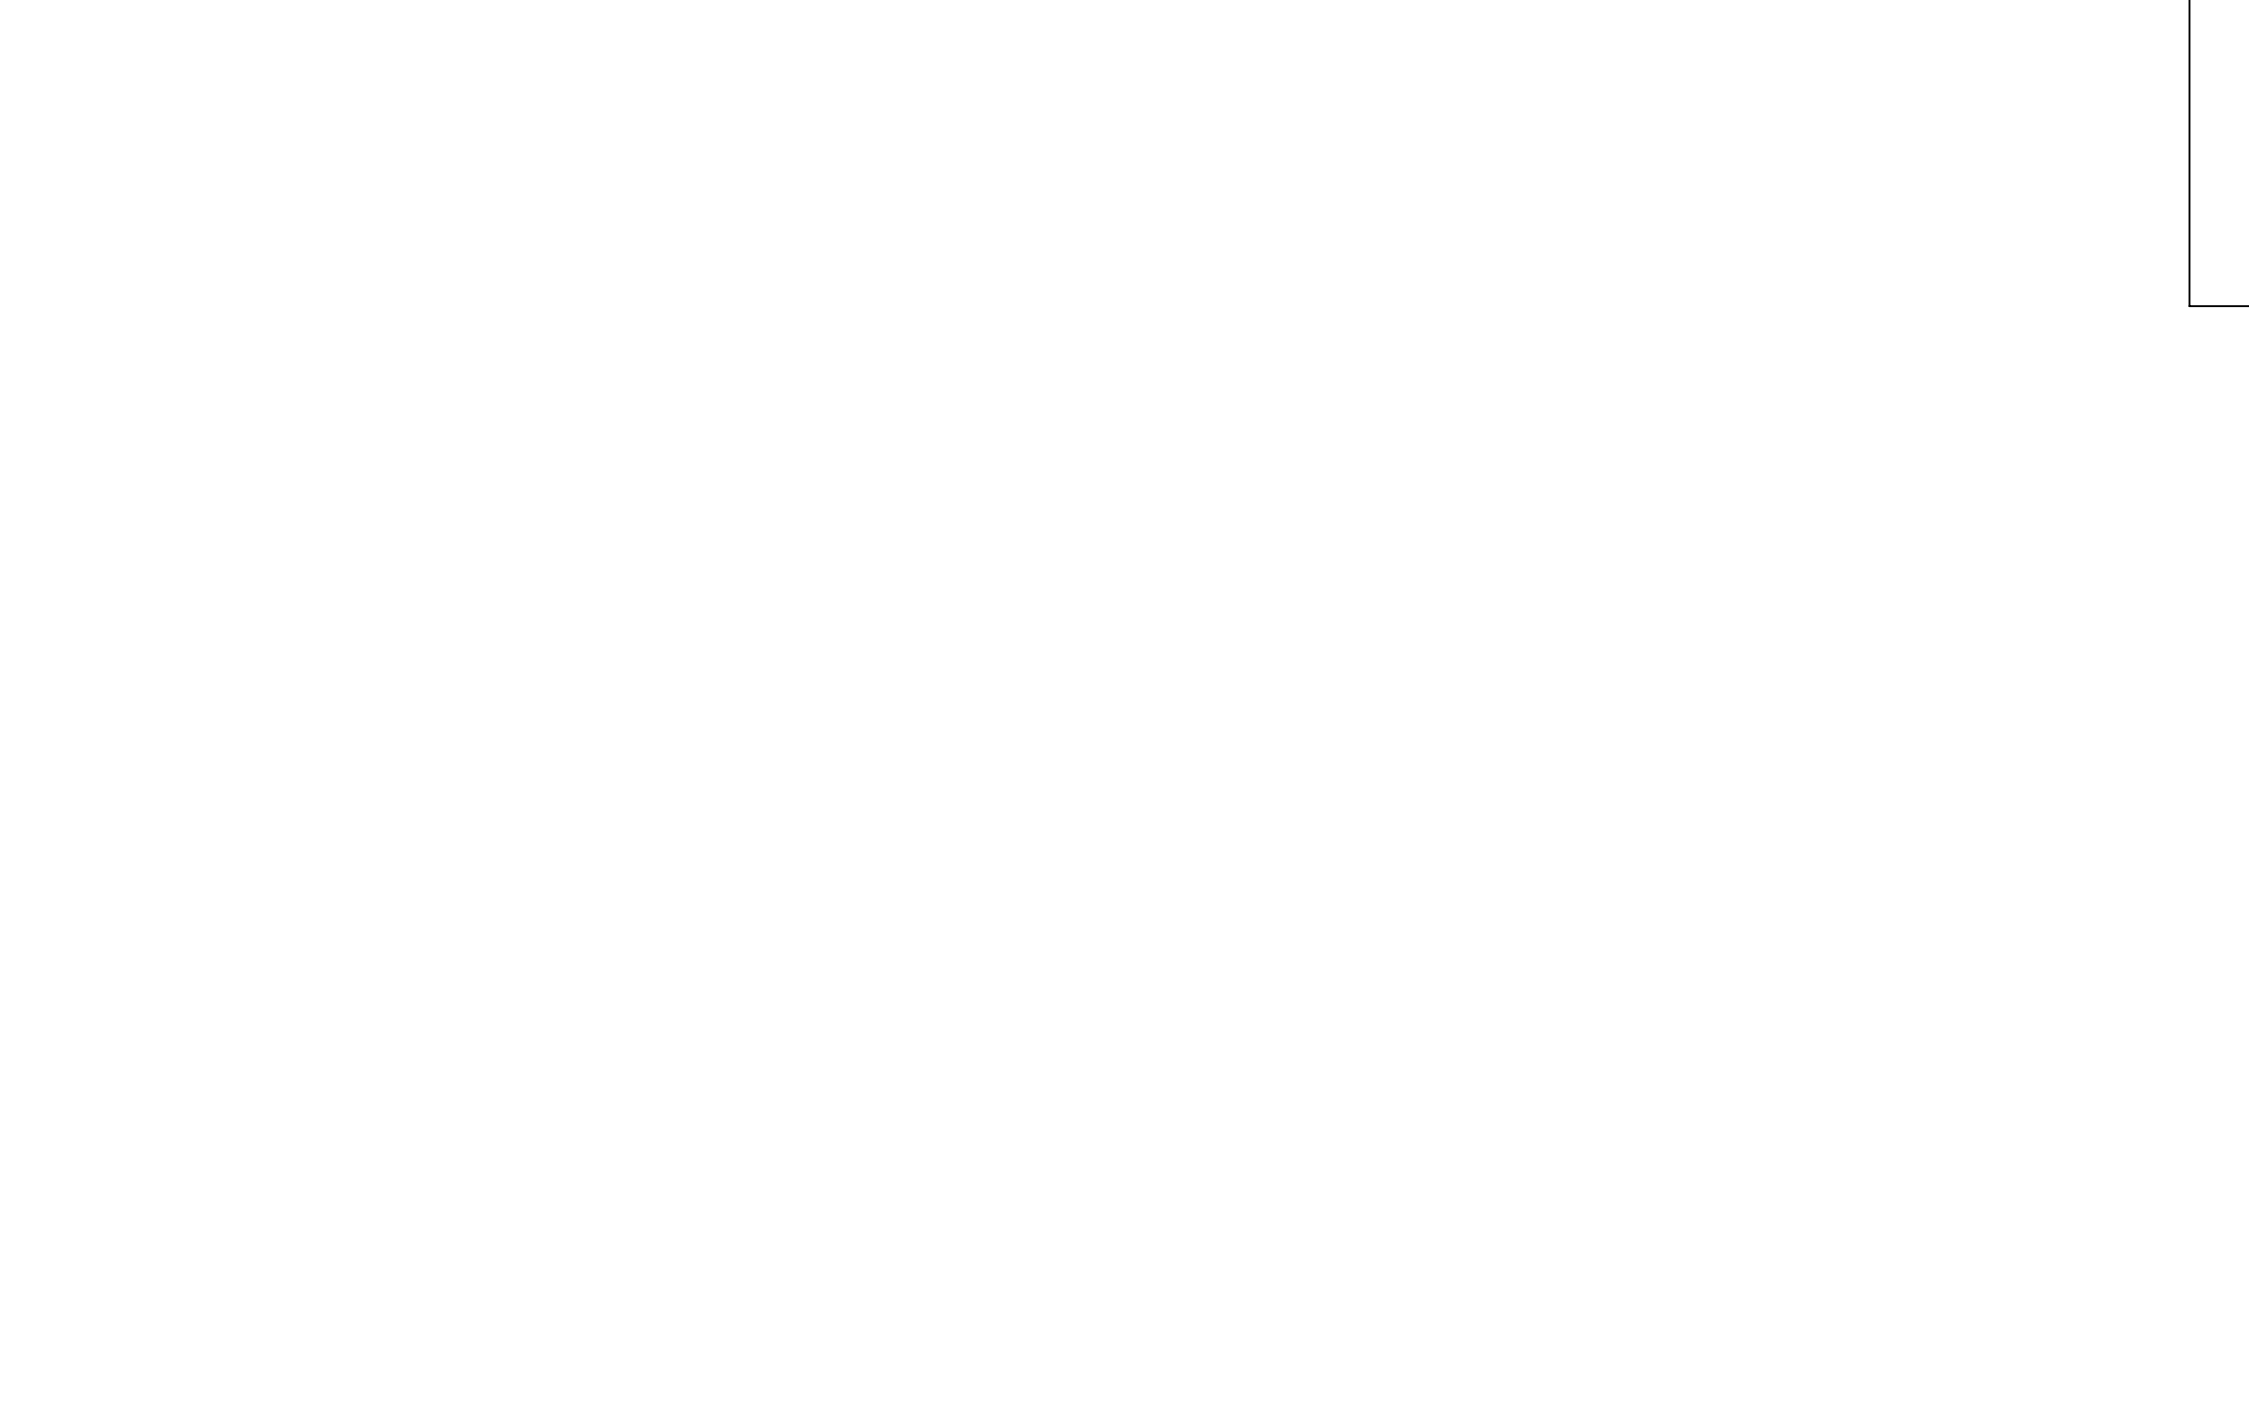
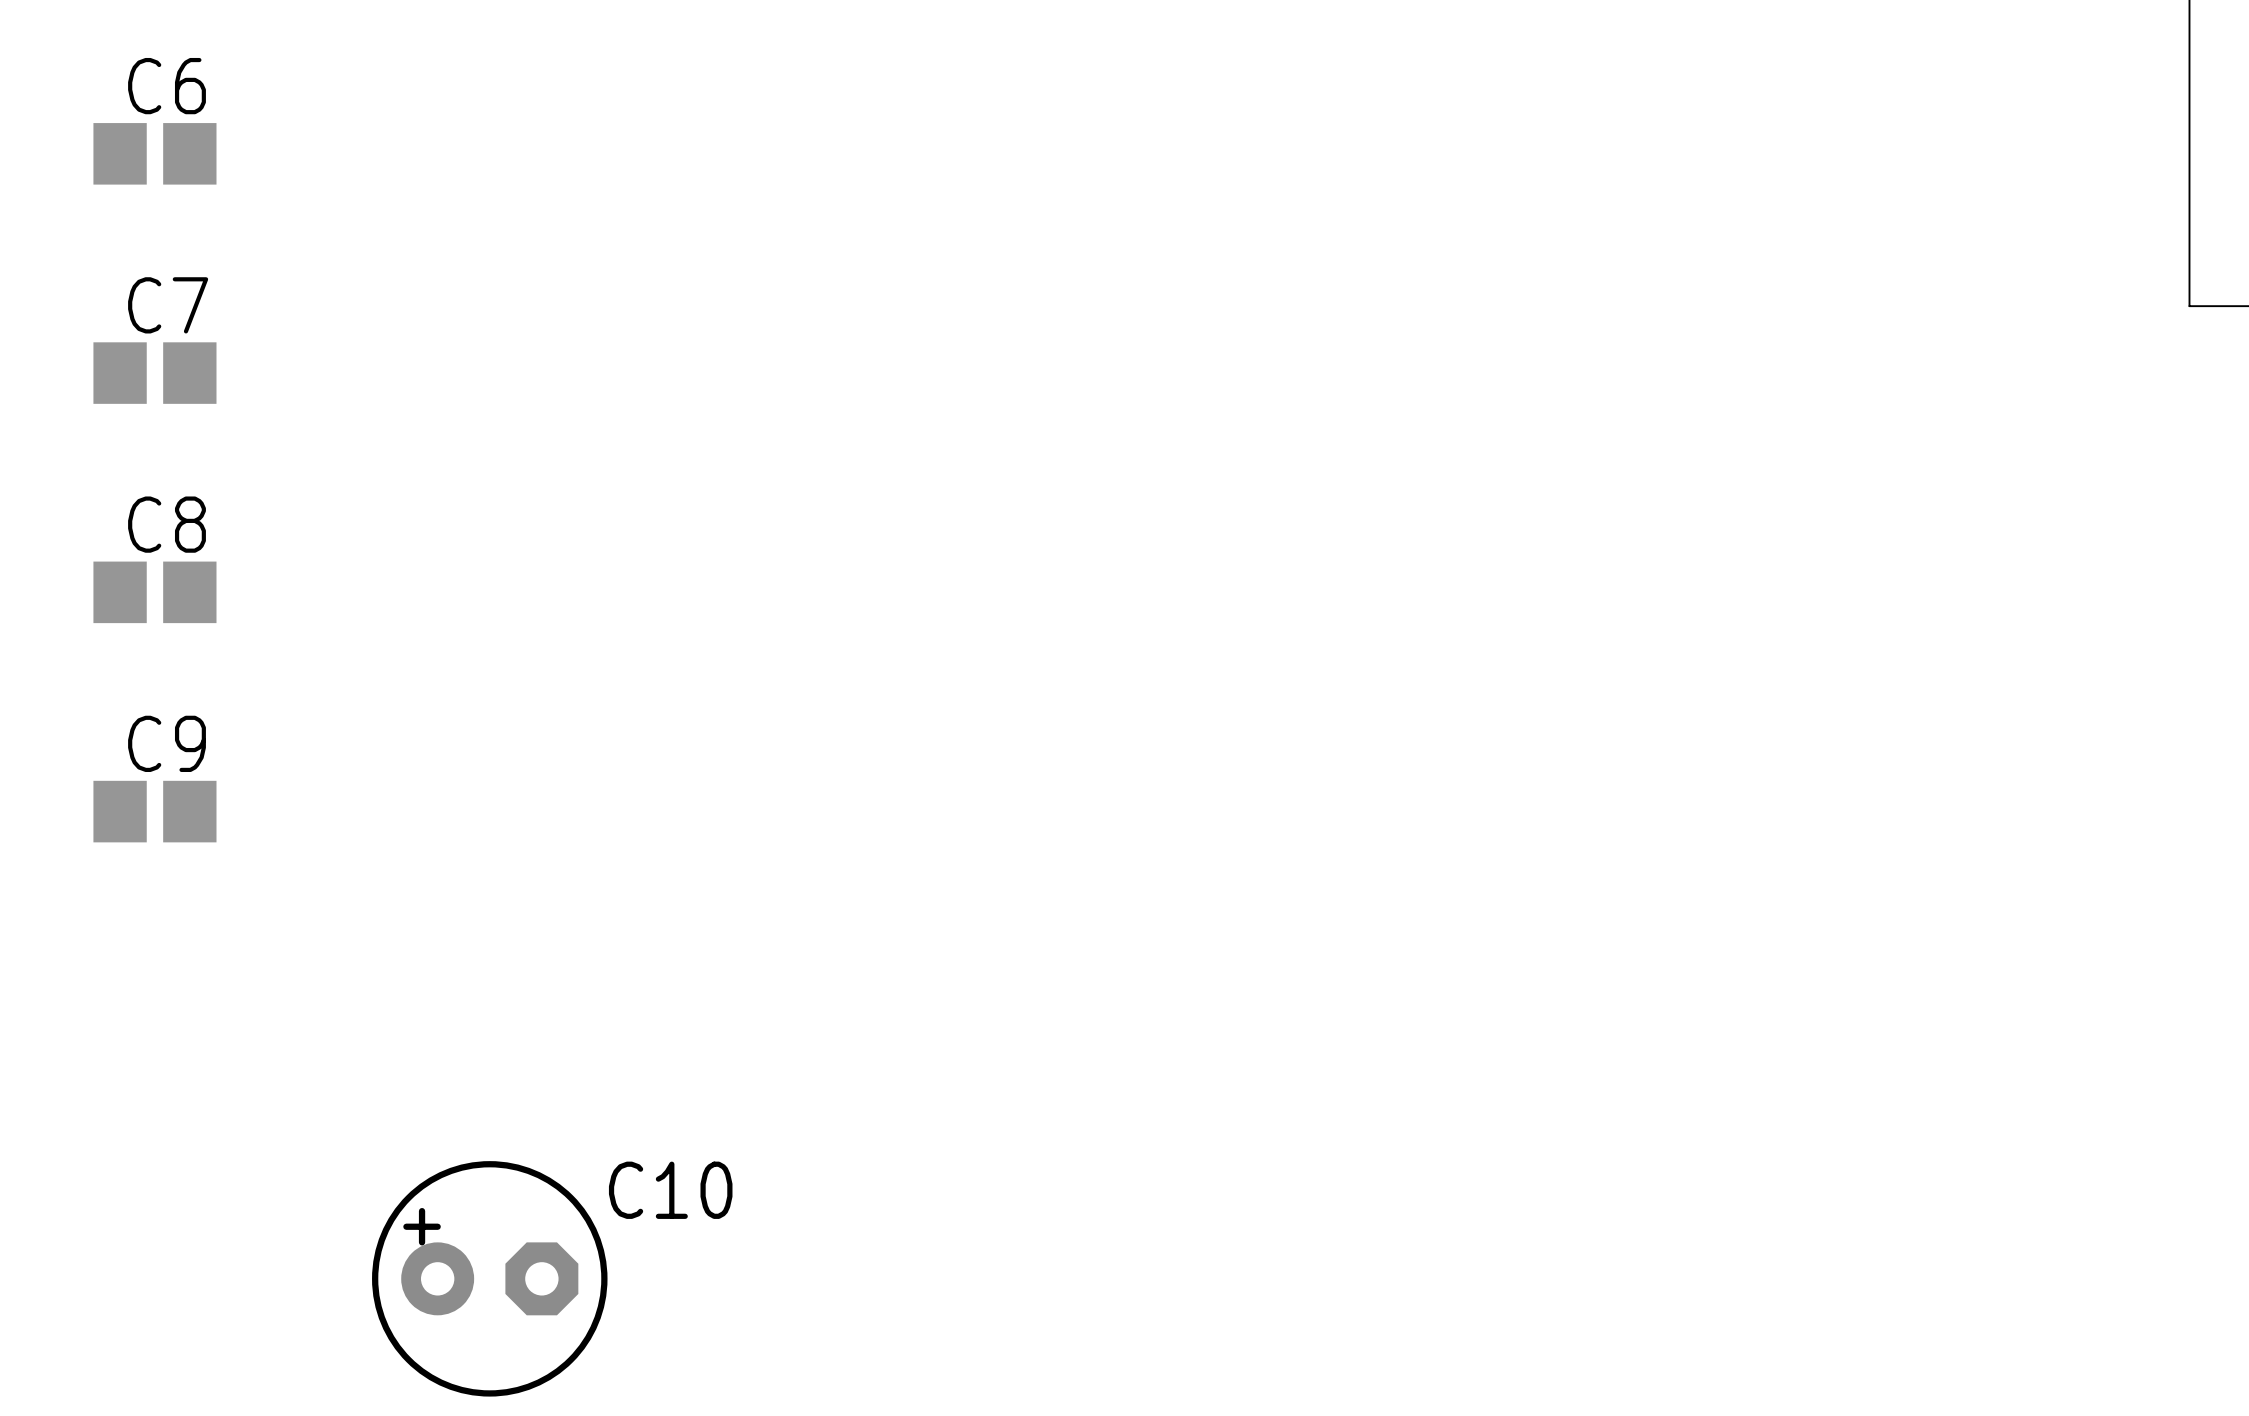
C6: none -> (154, 153)
C7: none -> (154, 373)
C8: none -> (154, 592)
C9: none -> (154, 811)
C10: none -> (489, 1278)

